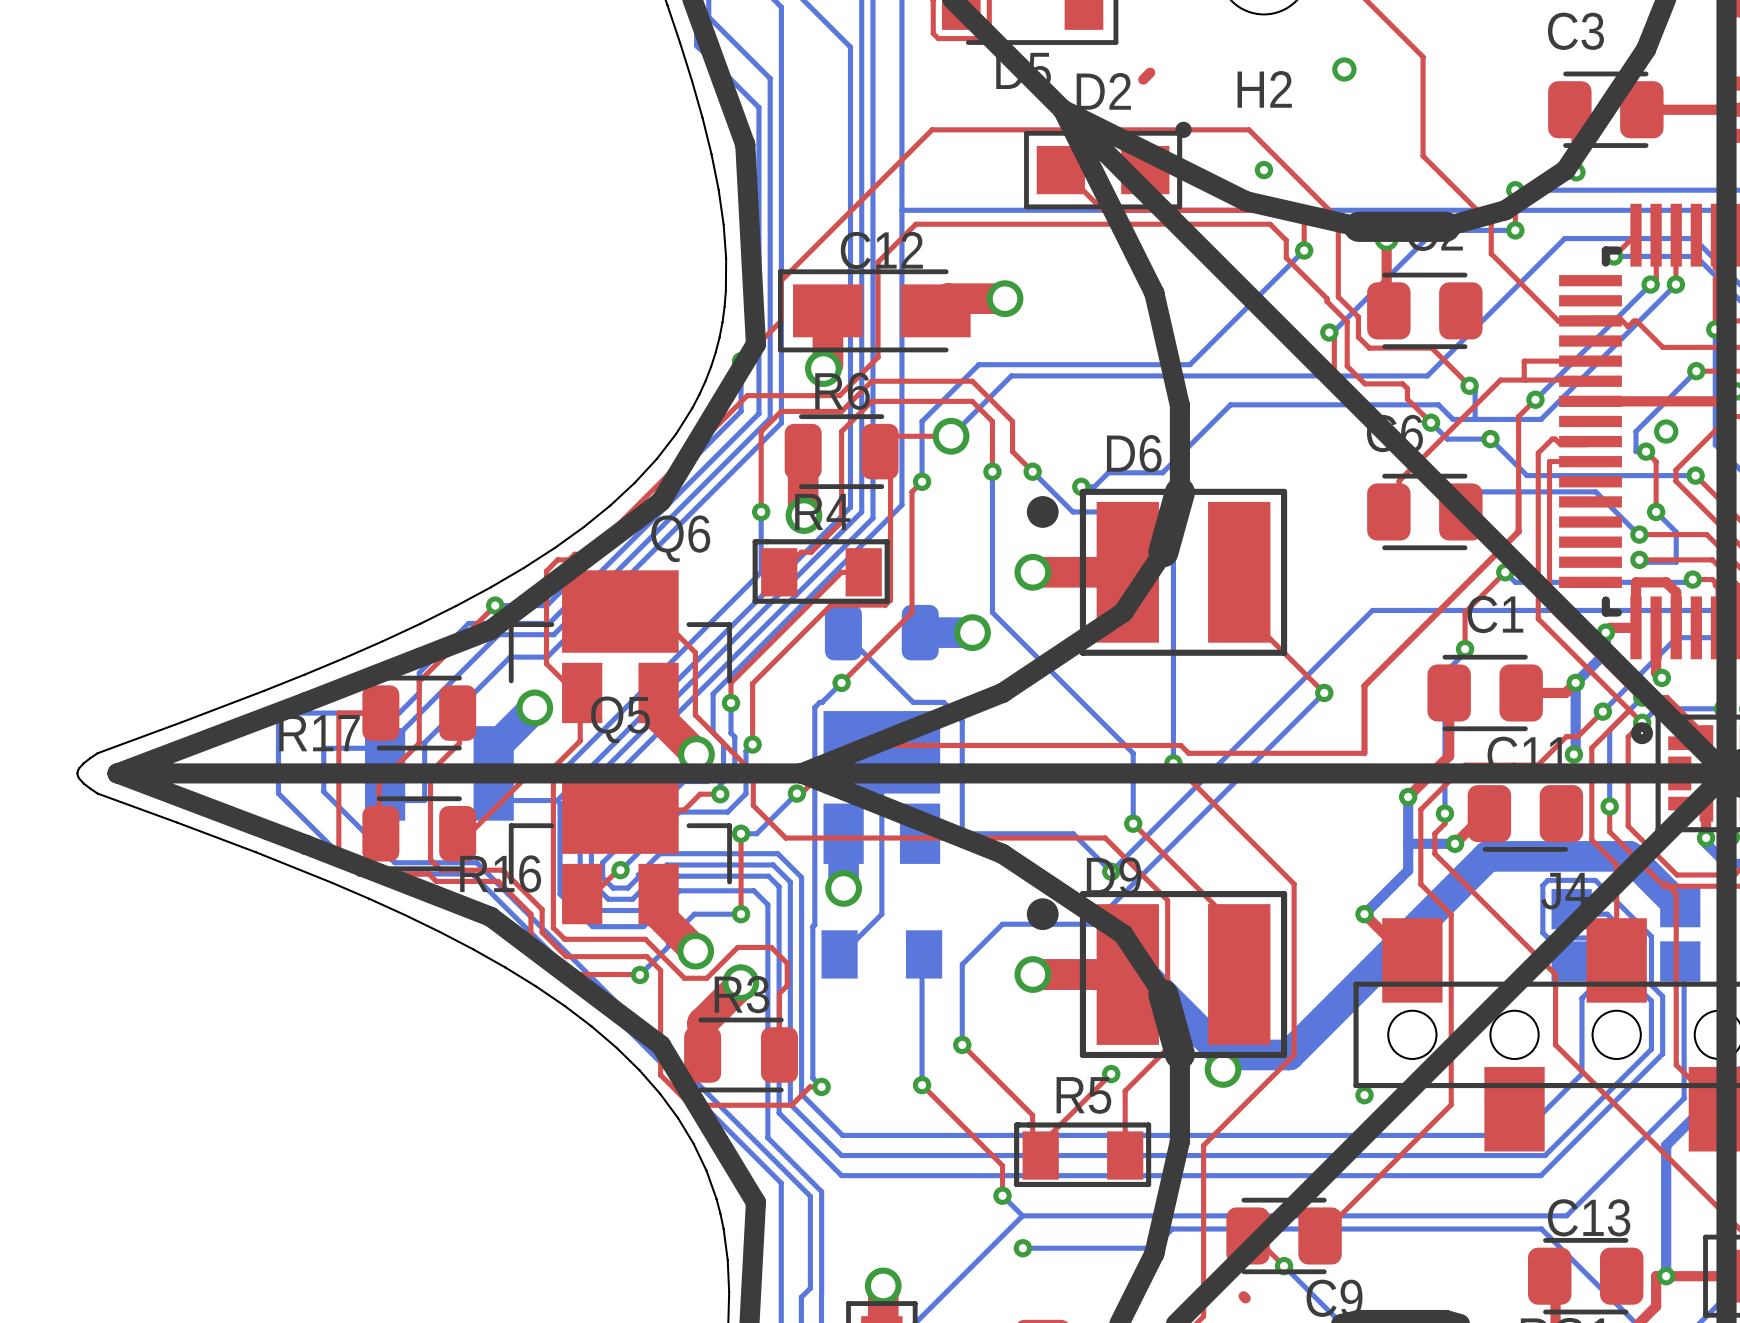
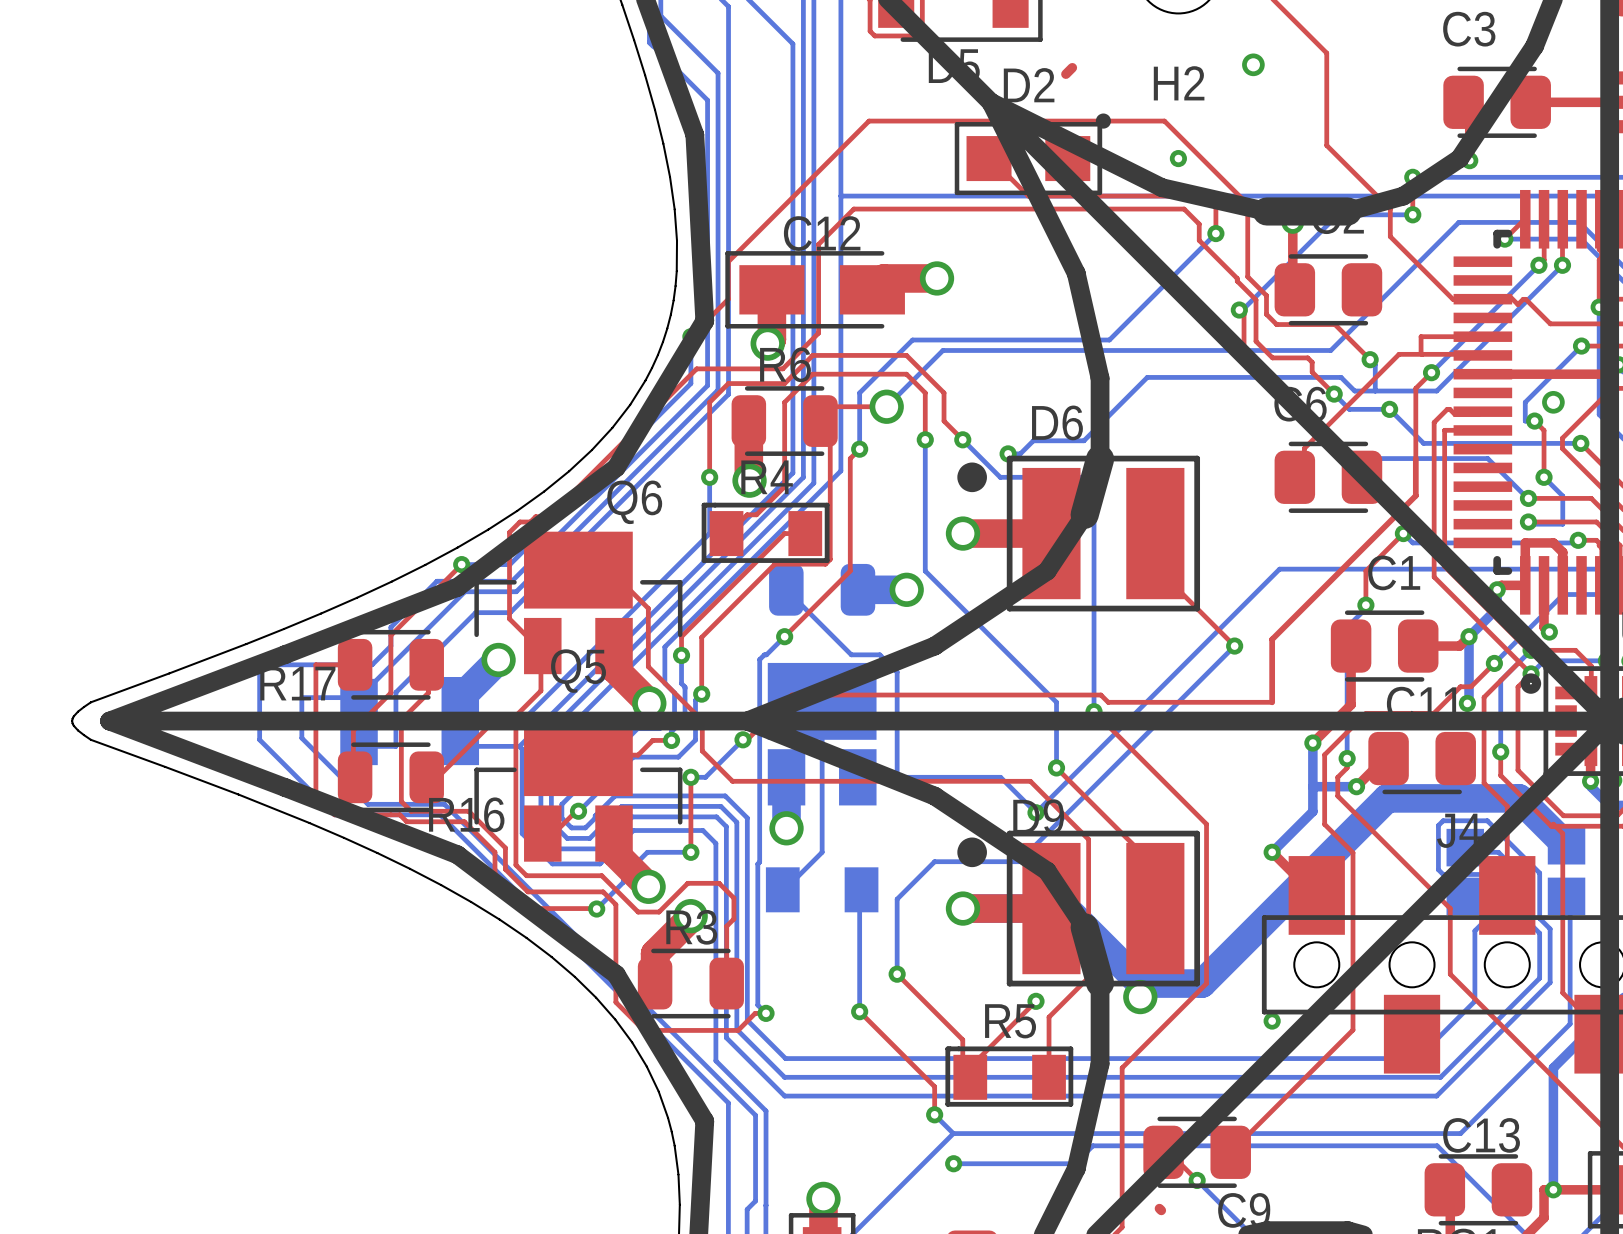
top track: (1667, 697) (1706, 736) -> (1554, 650) (1575, 650) (1591, 666) (1590, 686)

